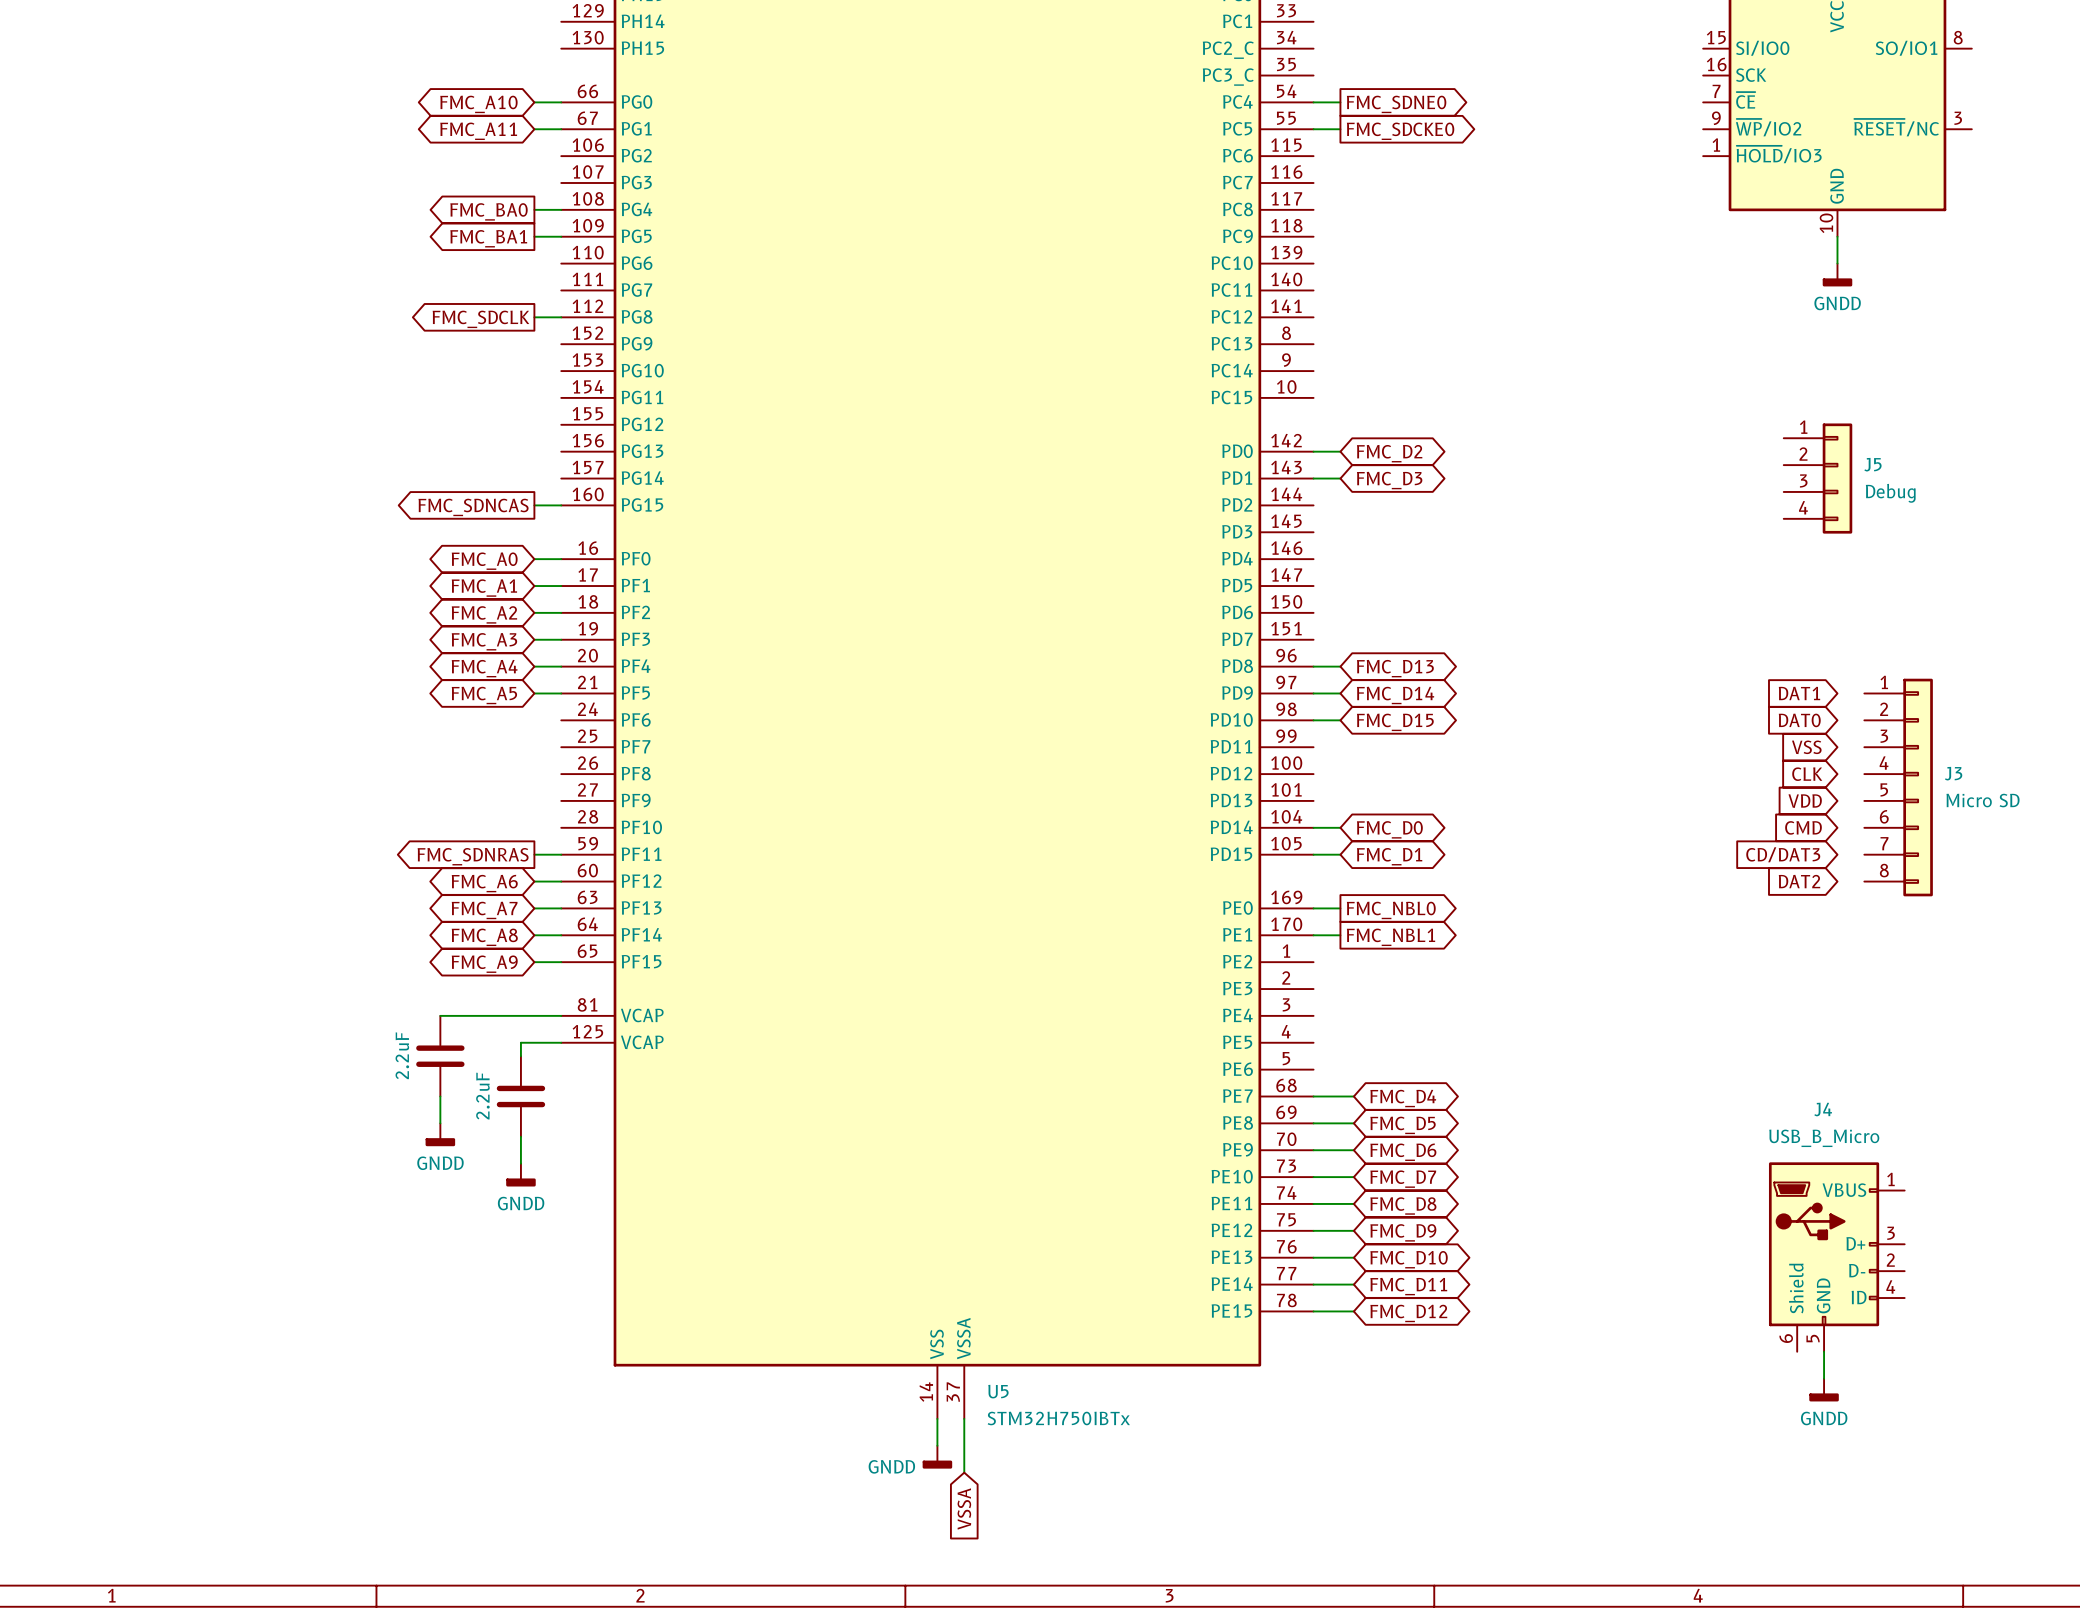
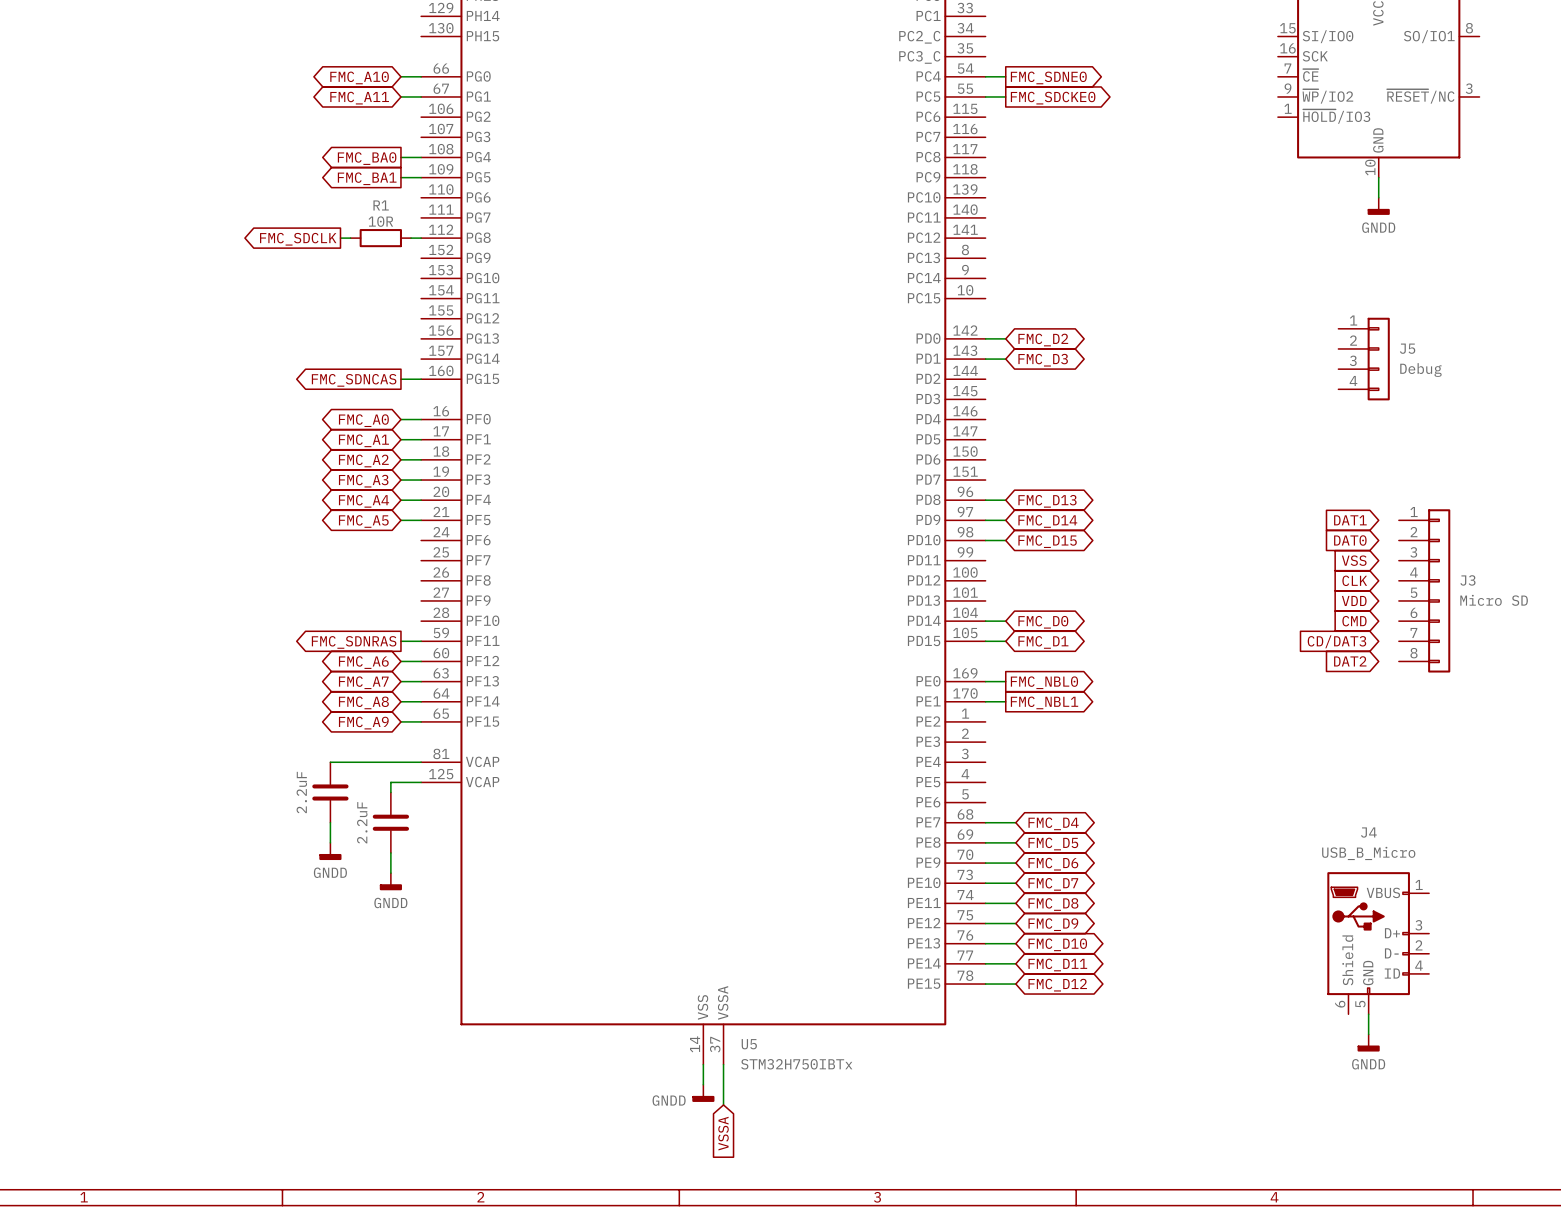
R1: none -> 10R (380, 238)
global label position: FMC_SDCLK (480, 319) -> FMC_SDCLK (298, 239)

